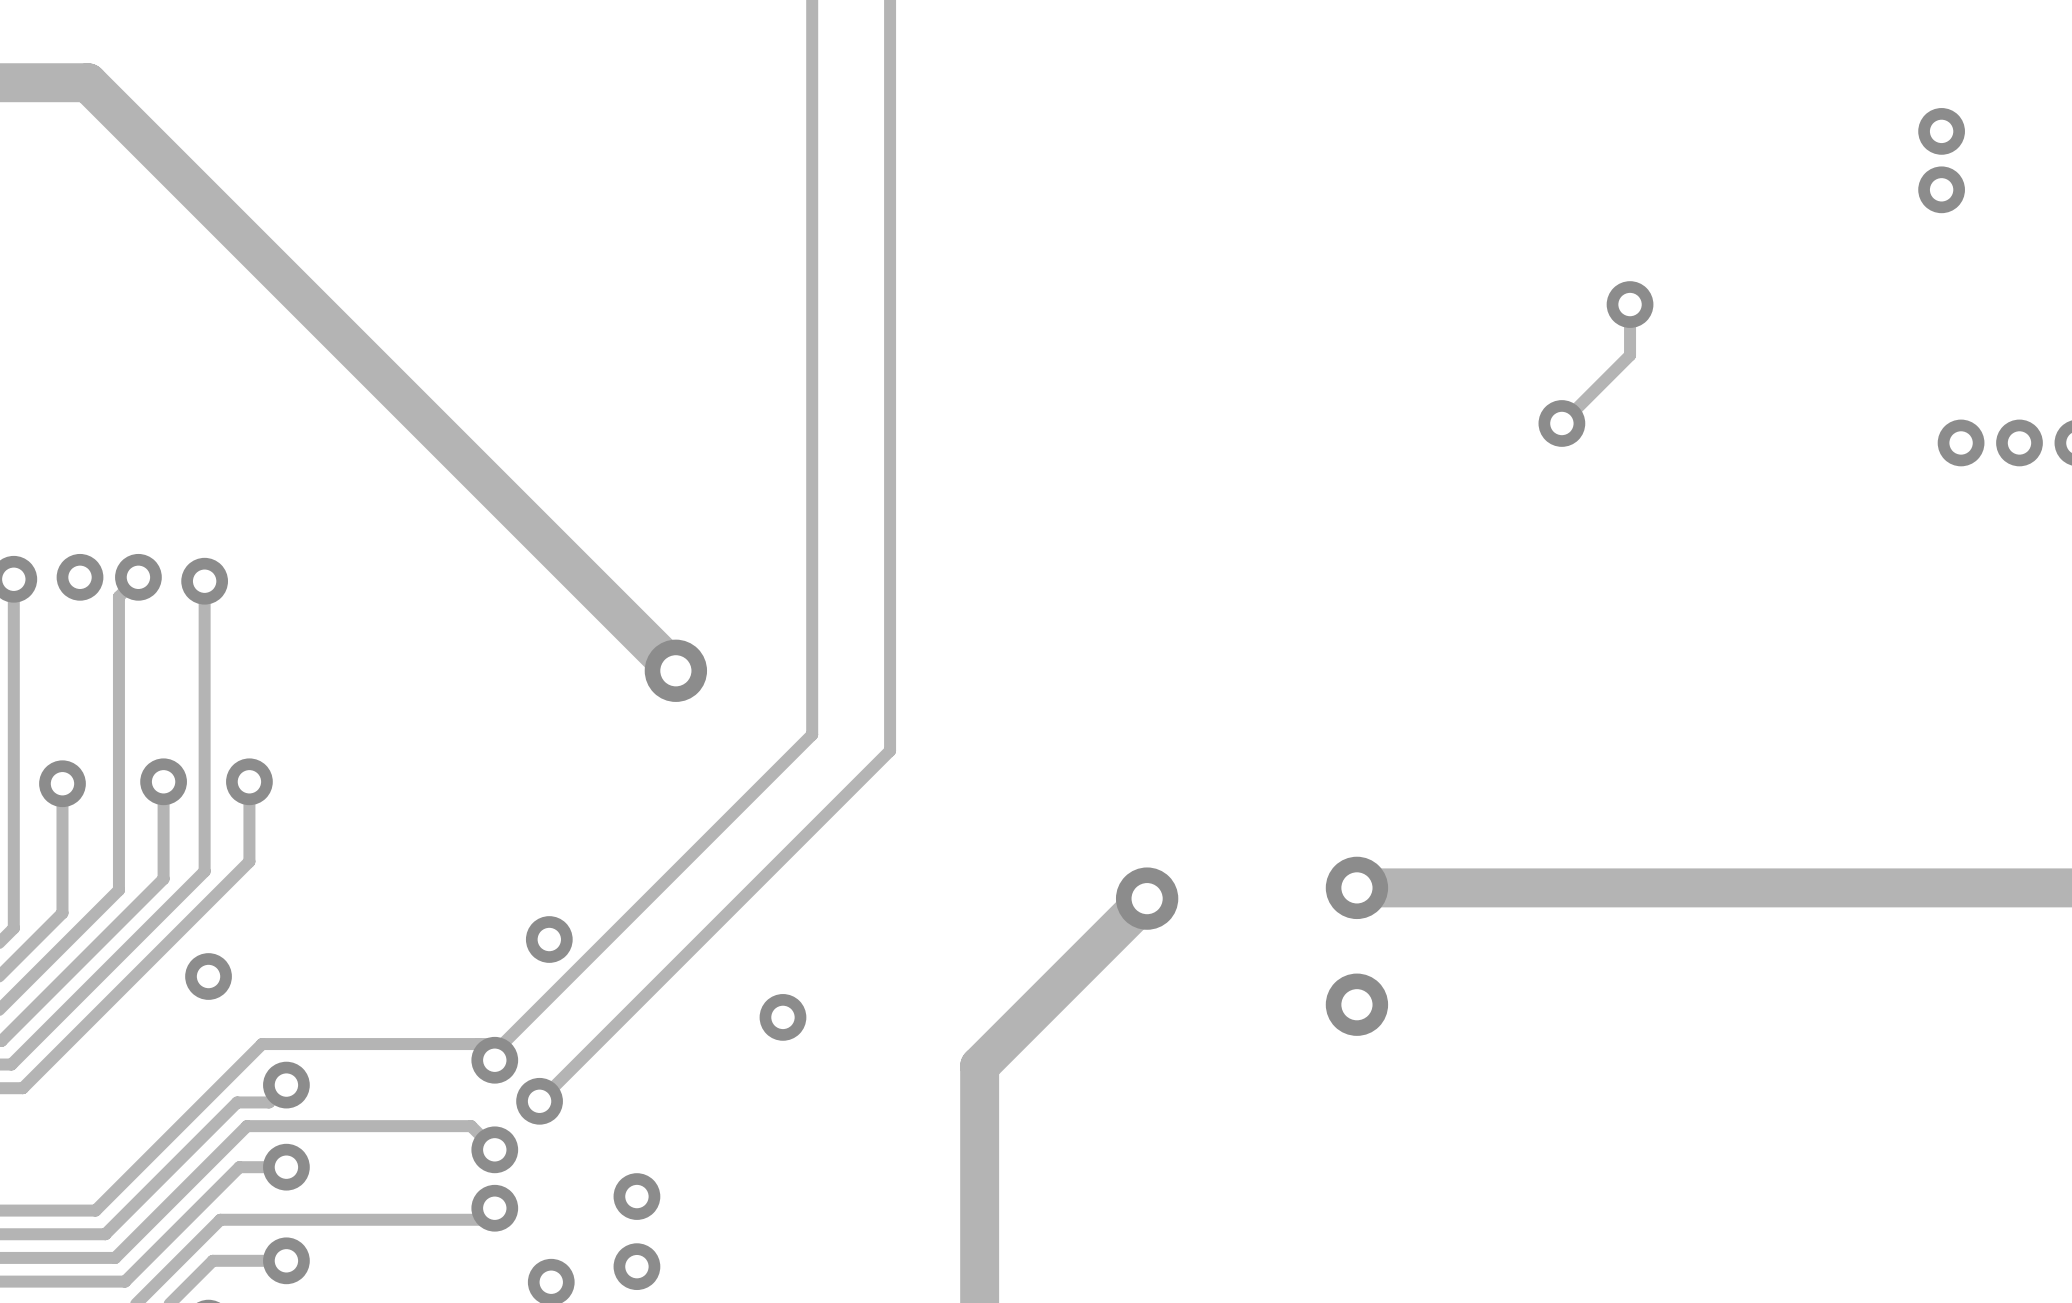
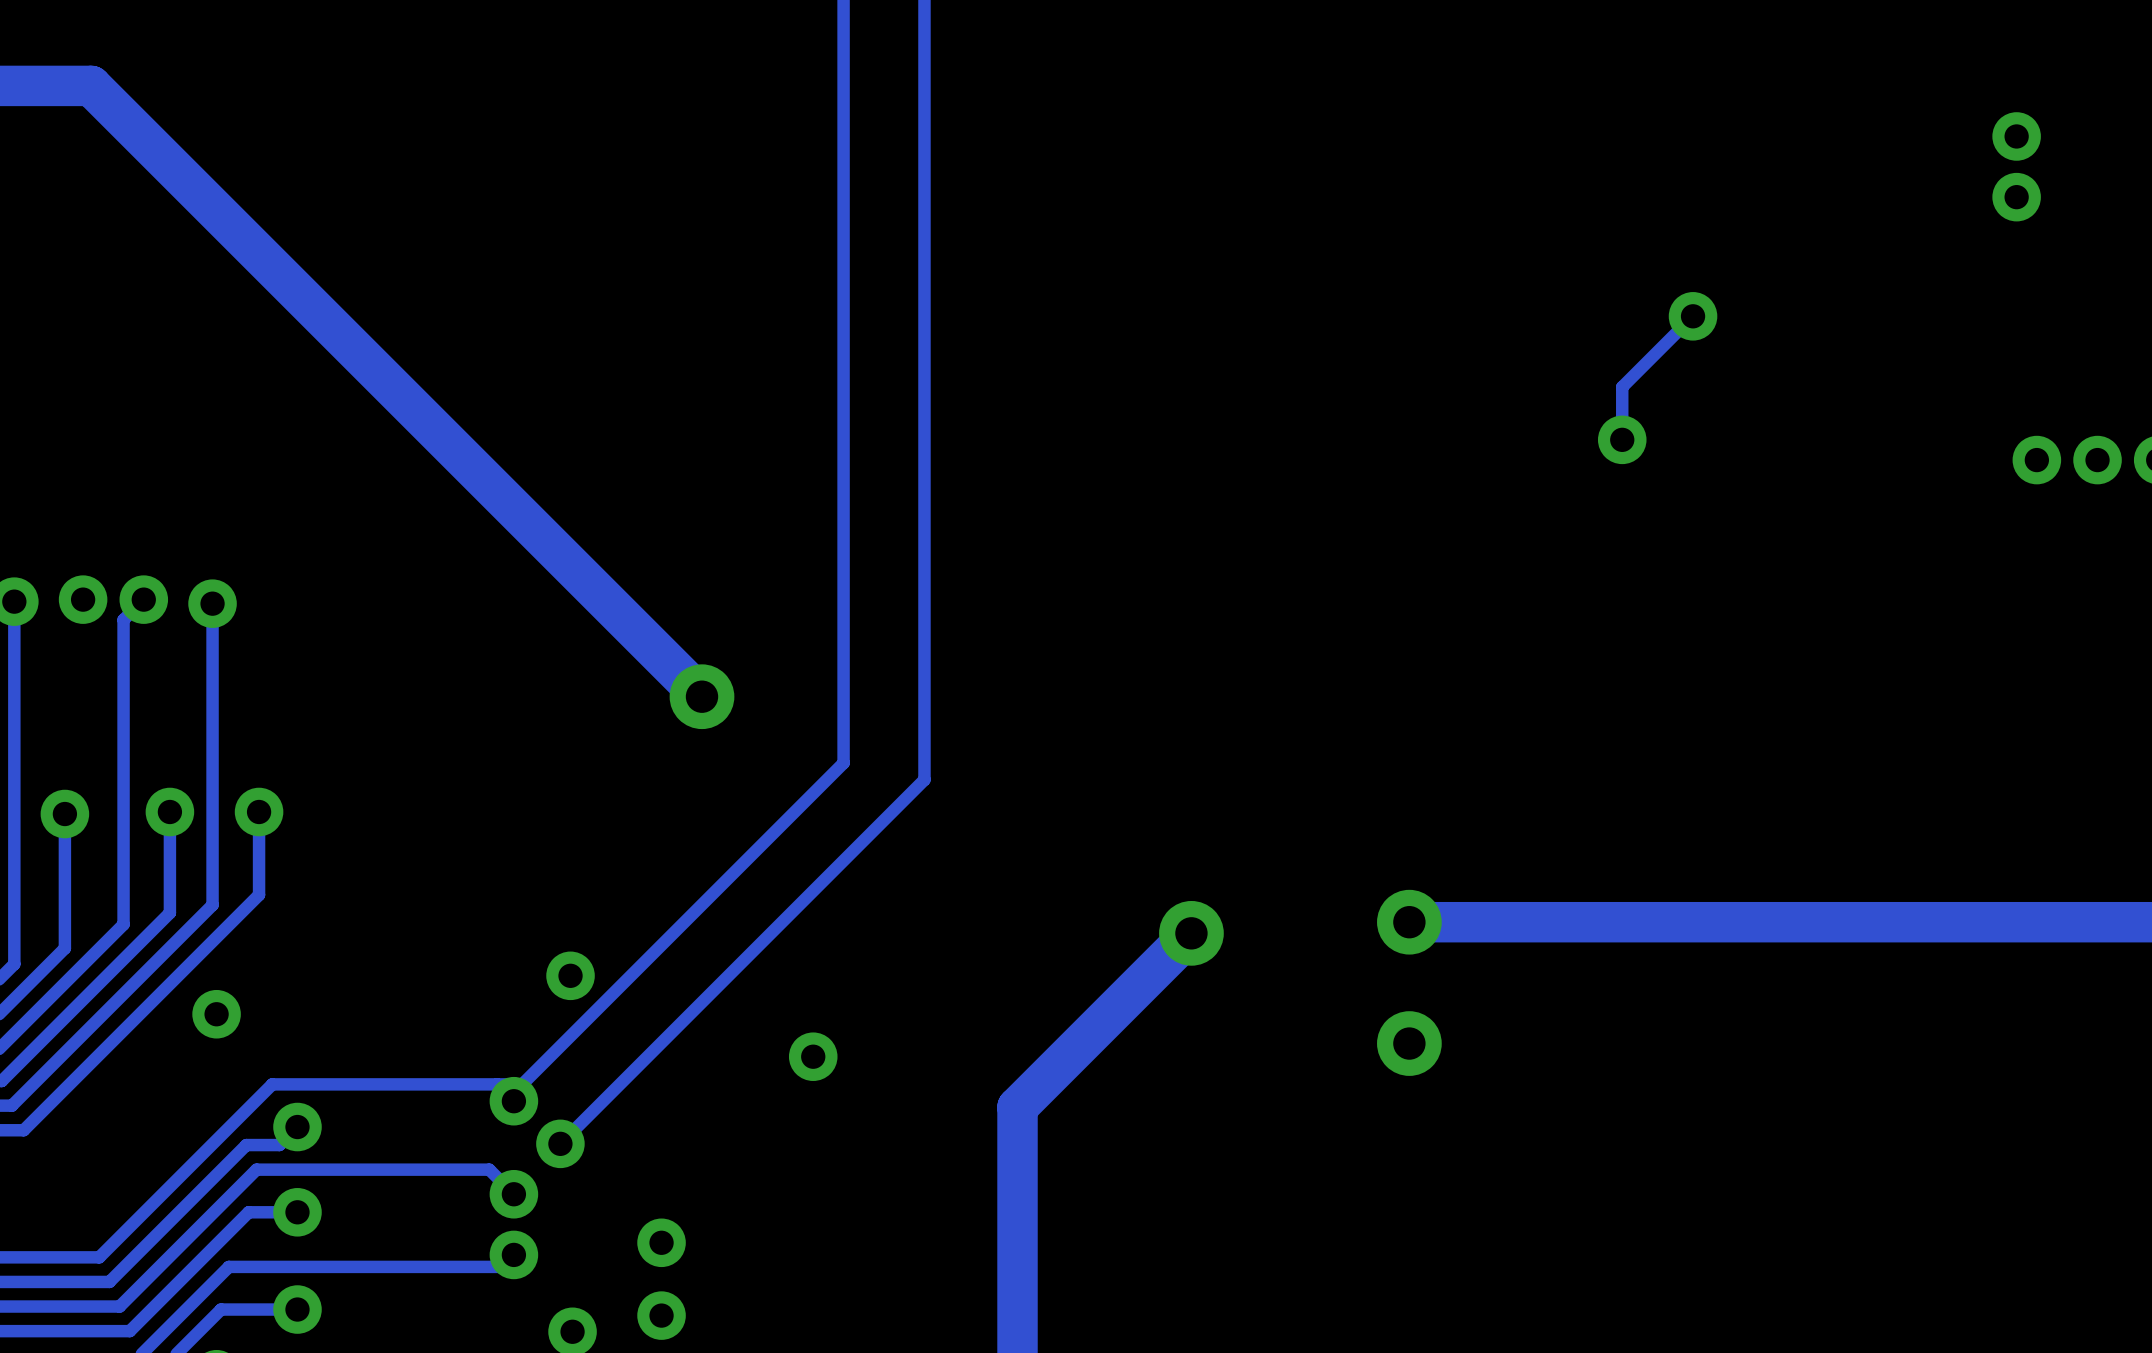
track: (1630, 304) (1630, 355) (1561, 423) -> (1693, 316) (1622, 387) (1622, 439)

